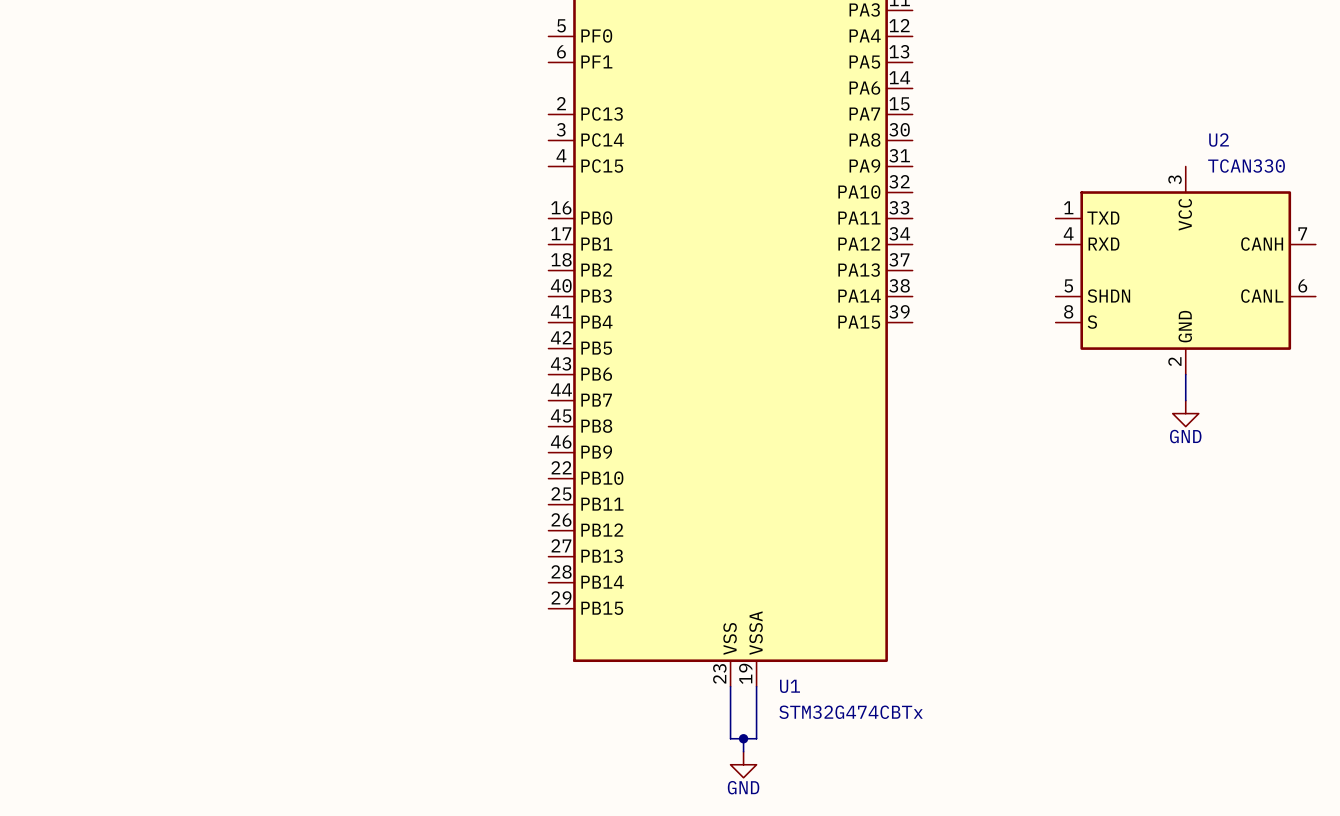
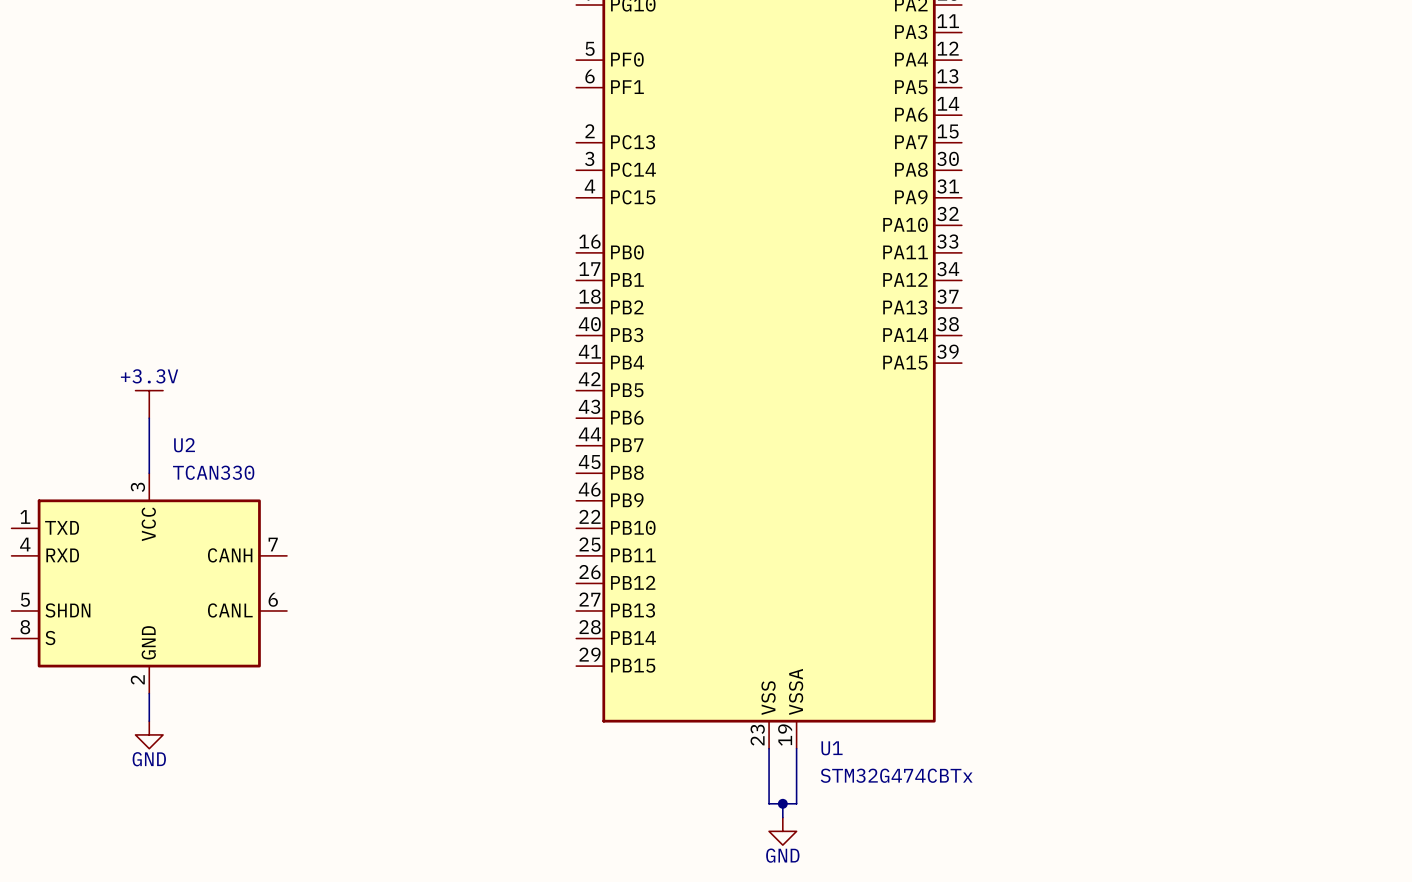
U2 position: (1185, 270) -> (149, 583)
power symbol: none -> +3.3V (149, 404)
wire: none -> (149, 418) (149, 473)
wire: (1185, 374) (1185, 400) -> none
power symbol: GND (1185, 413) -> none
wire: none -> (149, 693) (149, 721)
power symbol: none -> GND (149, 734)

